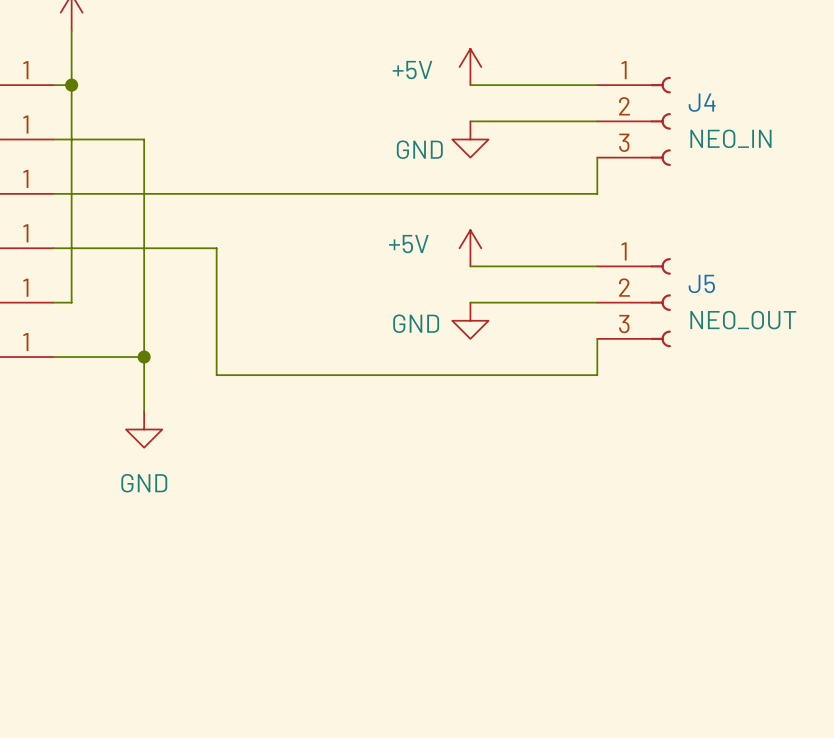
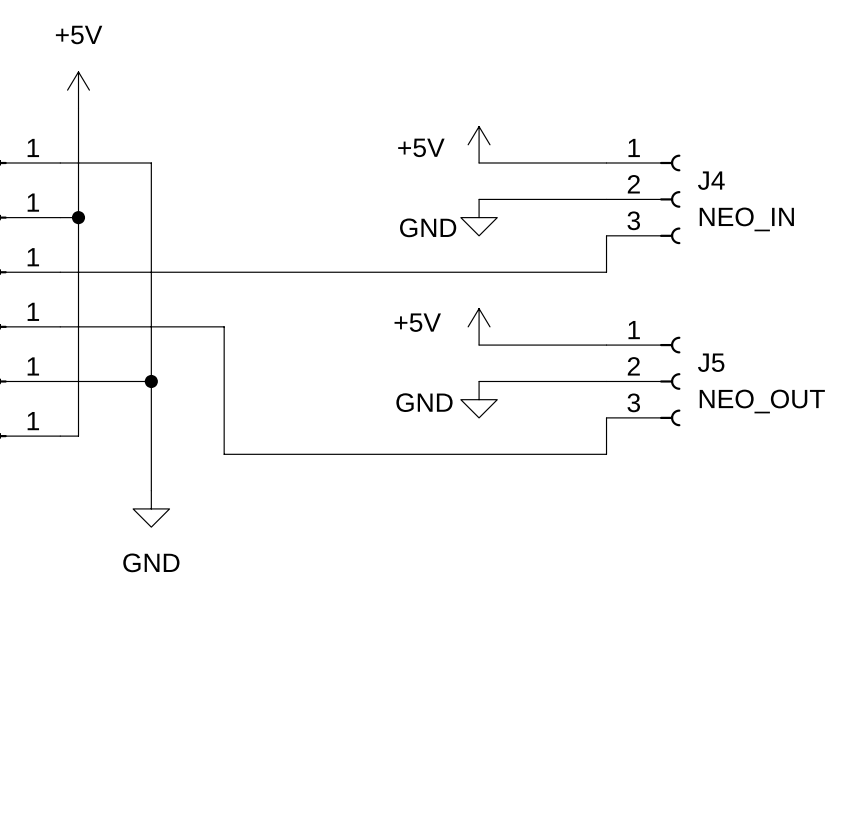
junction position: (71, 85) -> (78, 217)
wire: (71, 139) (144, 139) -> (78, 162) (151, 162) (151, 217)
wire: (71, 357) (144, 357) -> (78, 436) (78, 381) (151, 381)
junction position: (144, 357) -> (151, 381)

